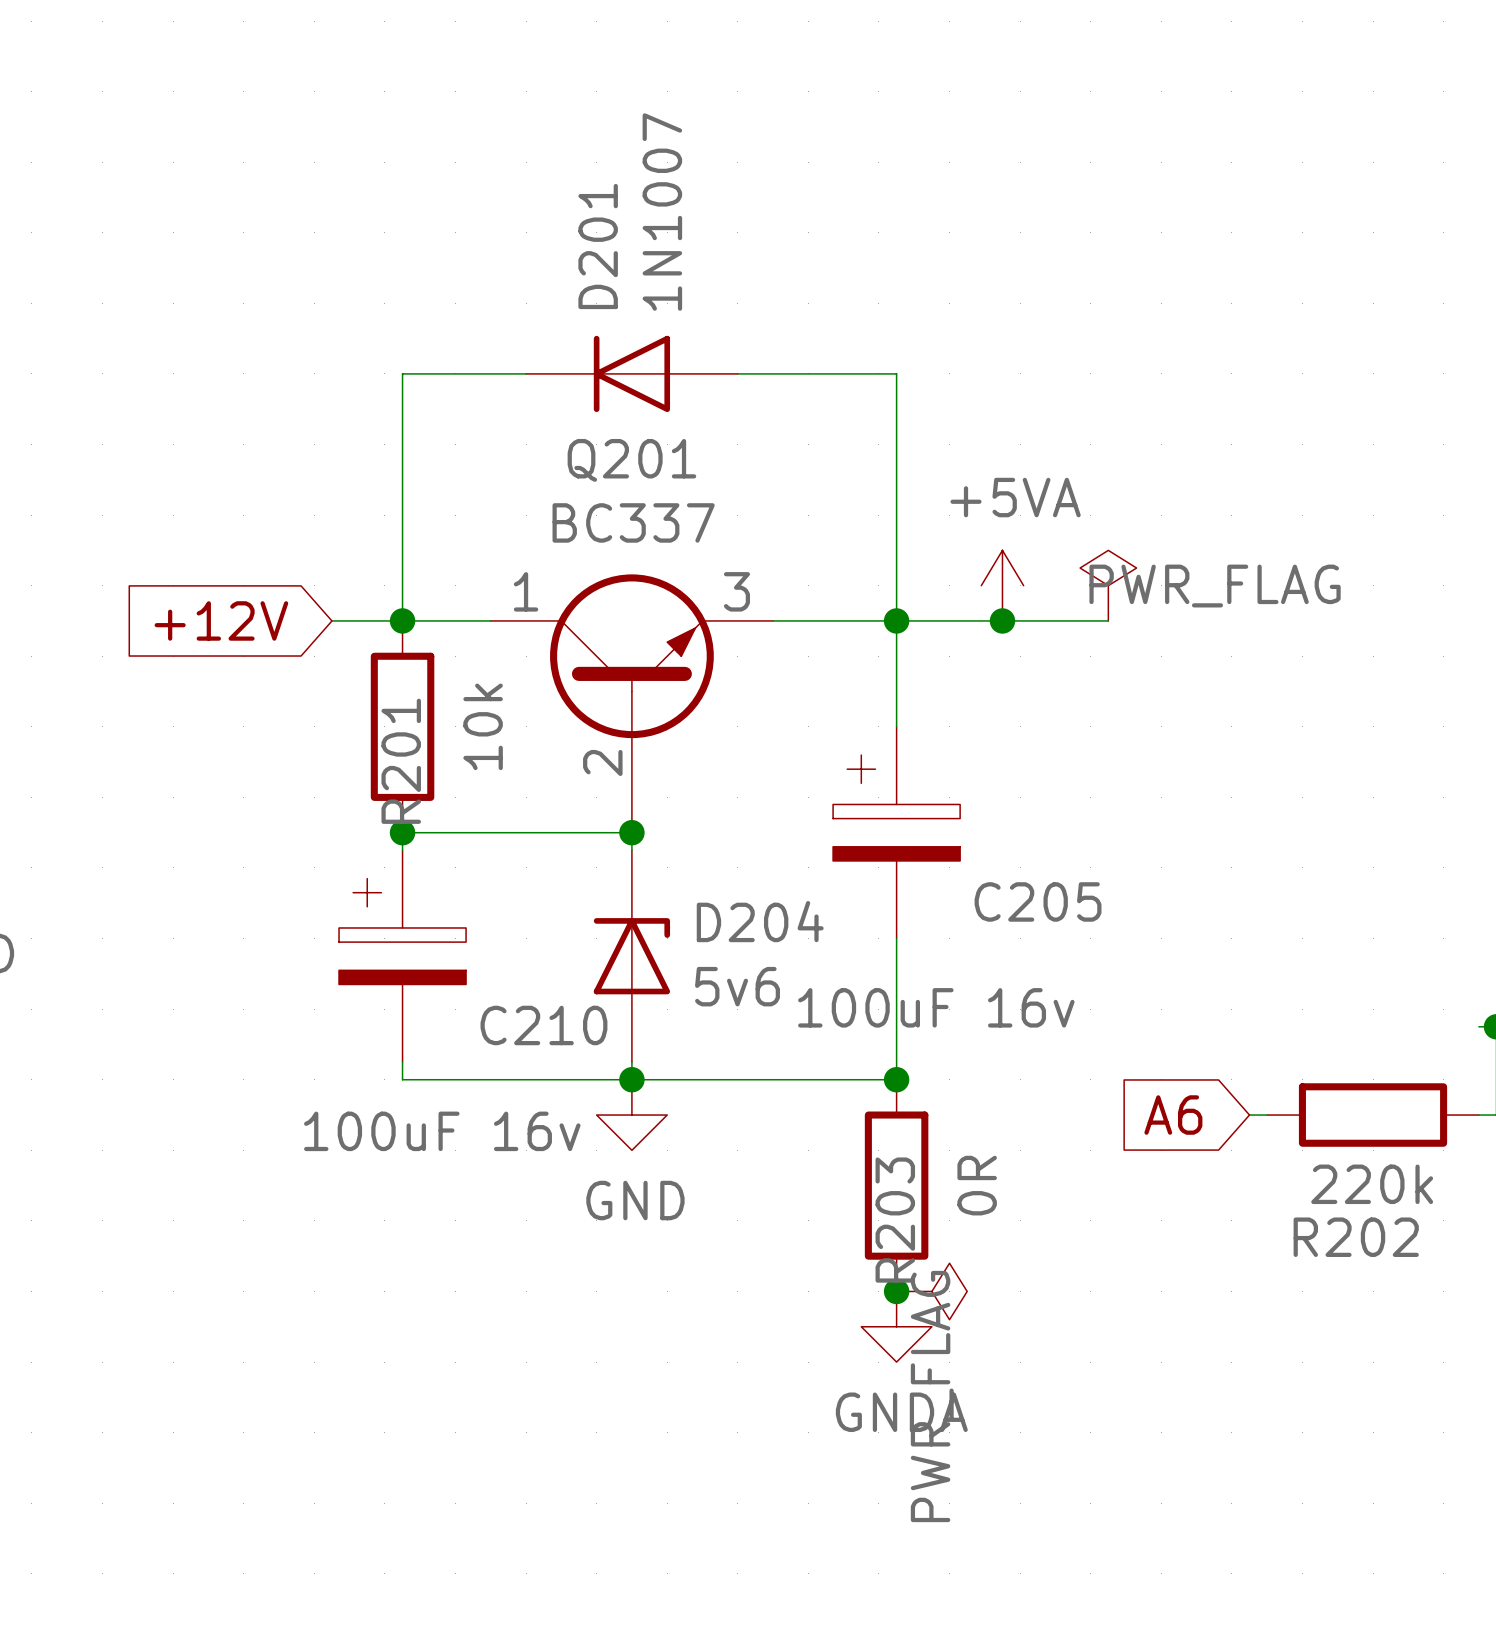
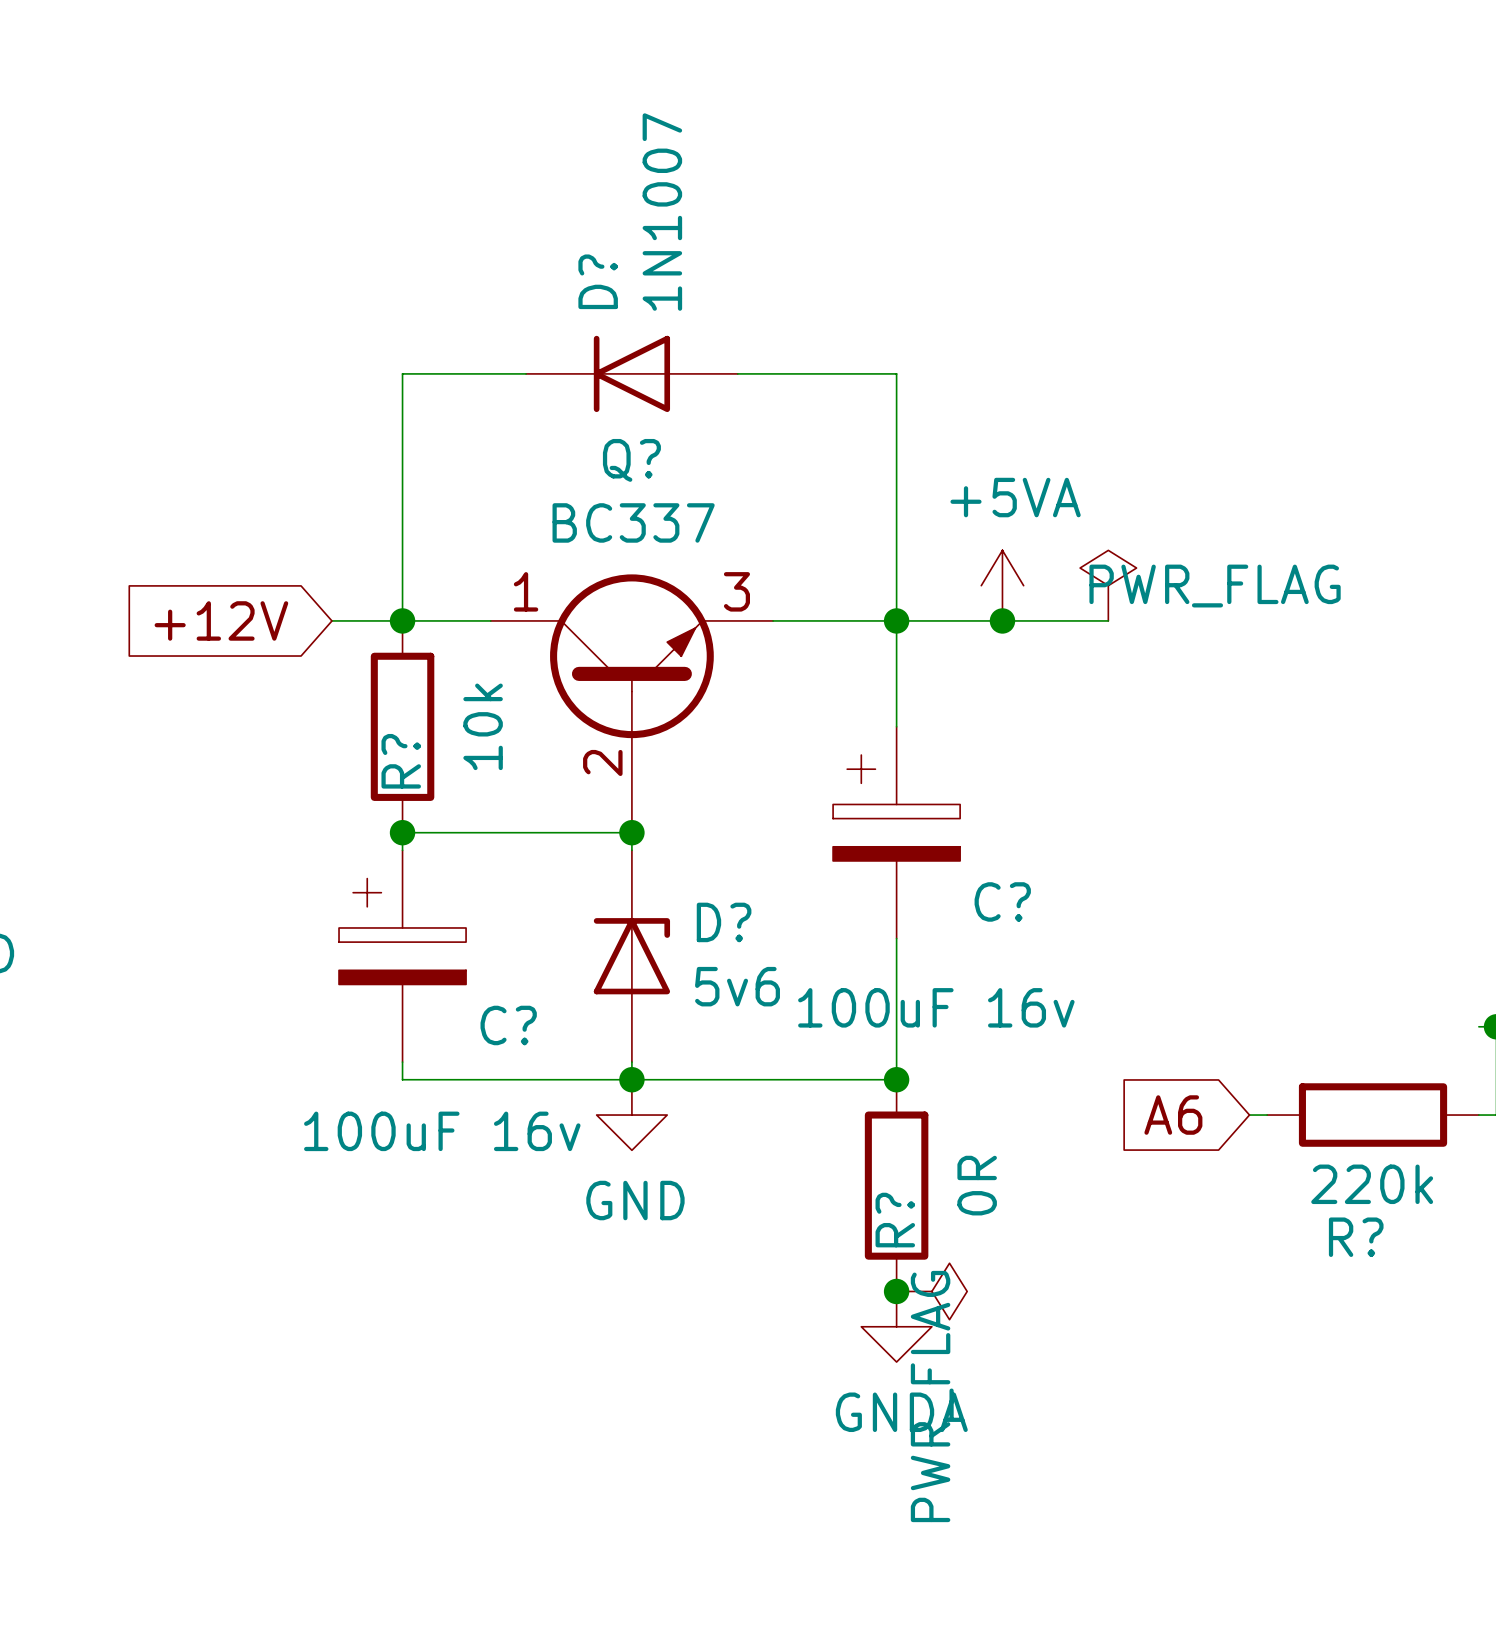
D201 name: D201 (598, 246) -> D? (598, 281)
Q201 name: Q201 (631, 460) -> Q? (631, 460)
R201 name: R201 (401, 761) -> R? (401, 761)
C205 name: C205 (1038, 901) -> C? (1002, 901)
D204 name: D204 (760, 921) -> D? (724, 922)
C210 name: C210 (543, 1025) -> C? (508, 1025)
R203 name: R203 (895, 1220) -> R? (895, 1220)
R202 name: R202 (1356, 1237) -> R? (1356, 1237)

